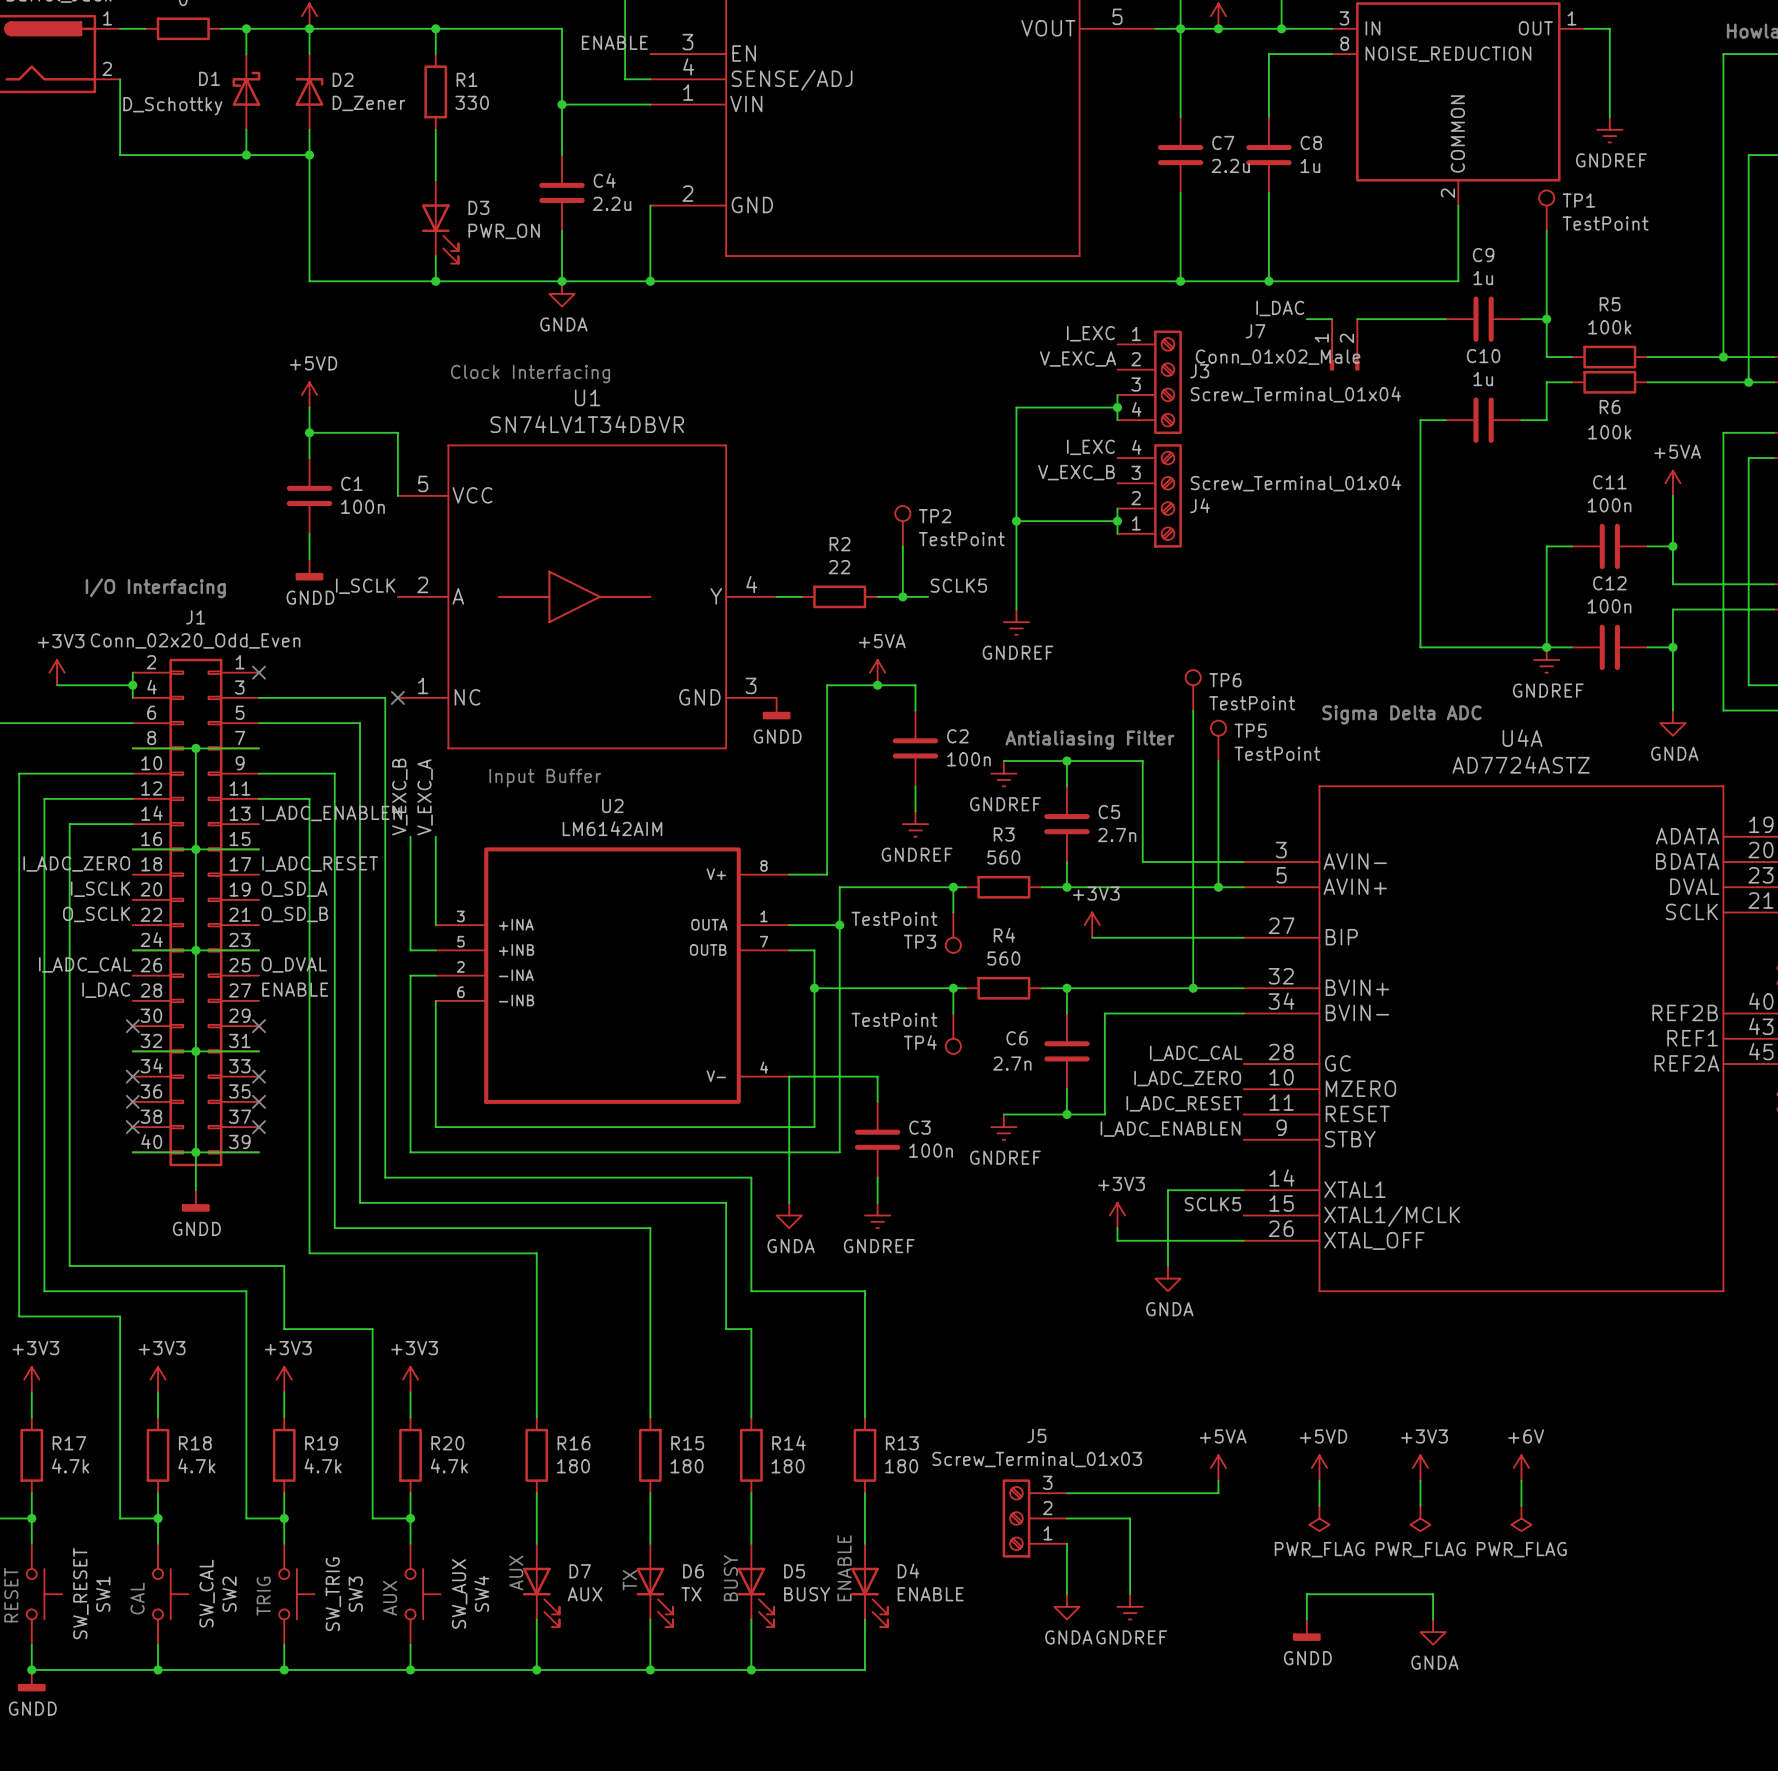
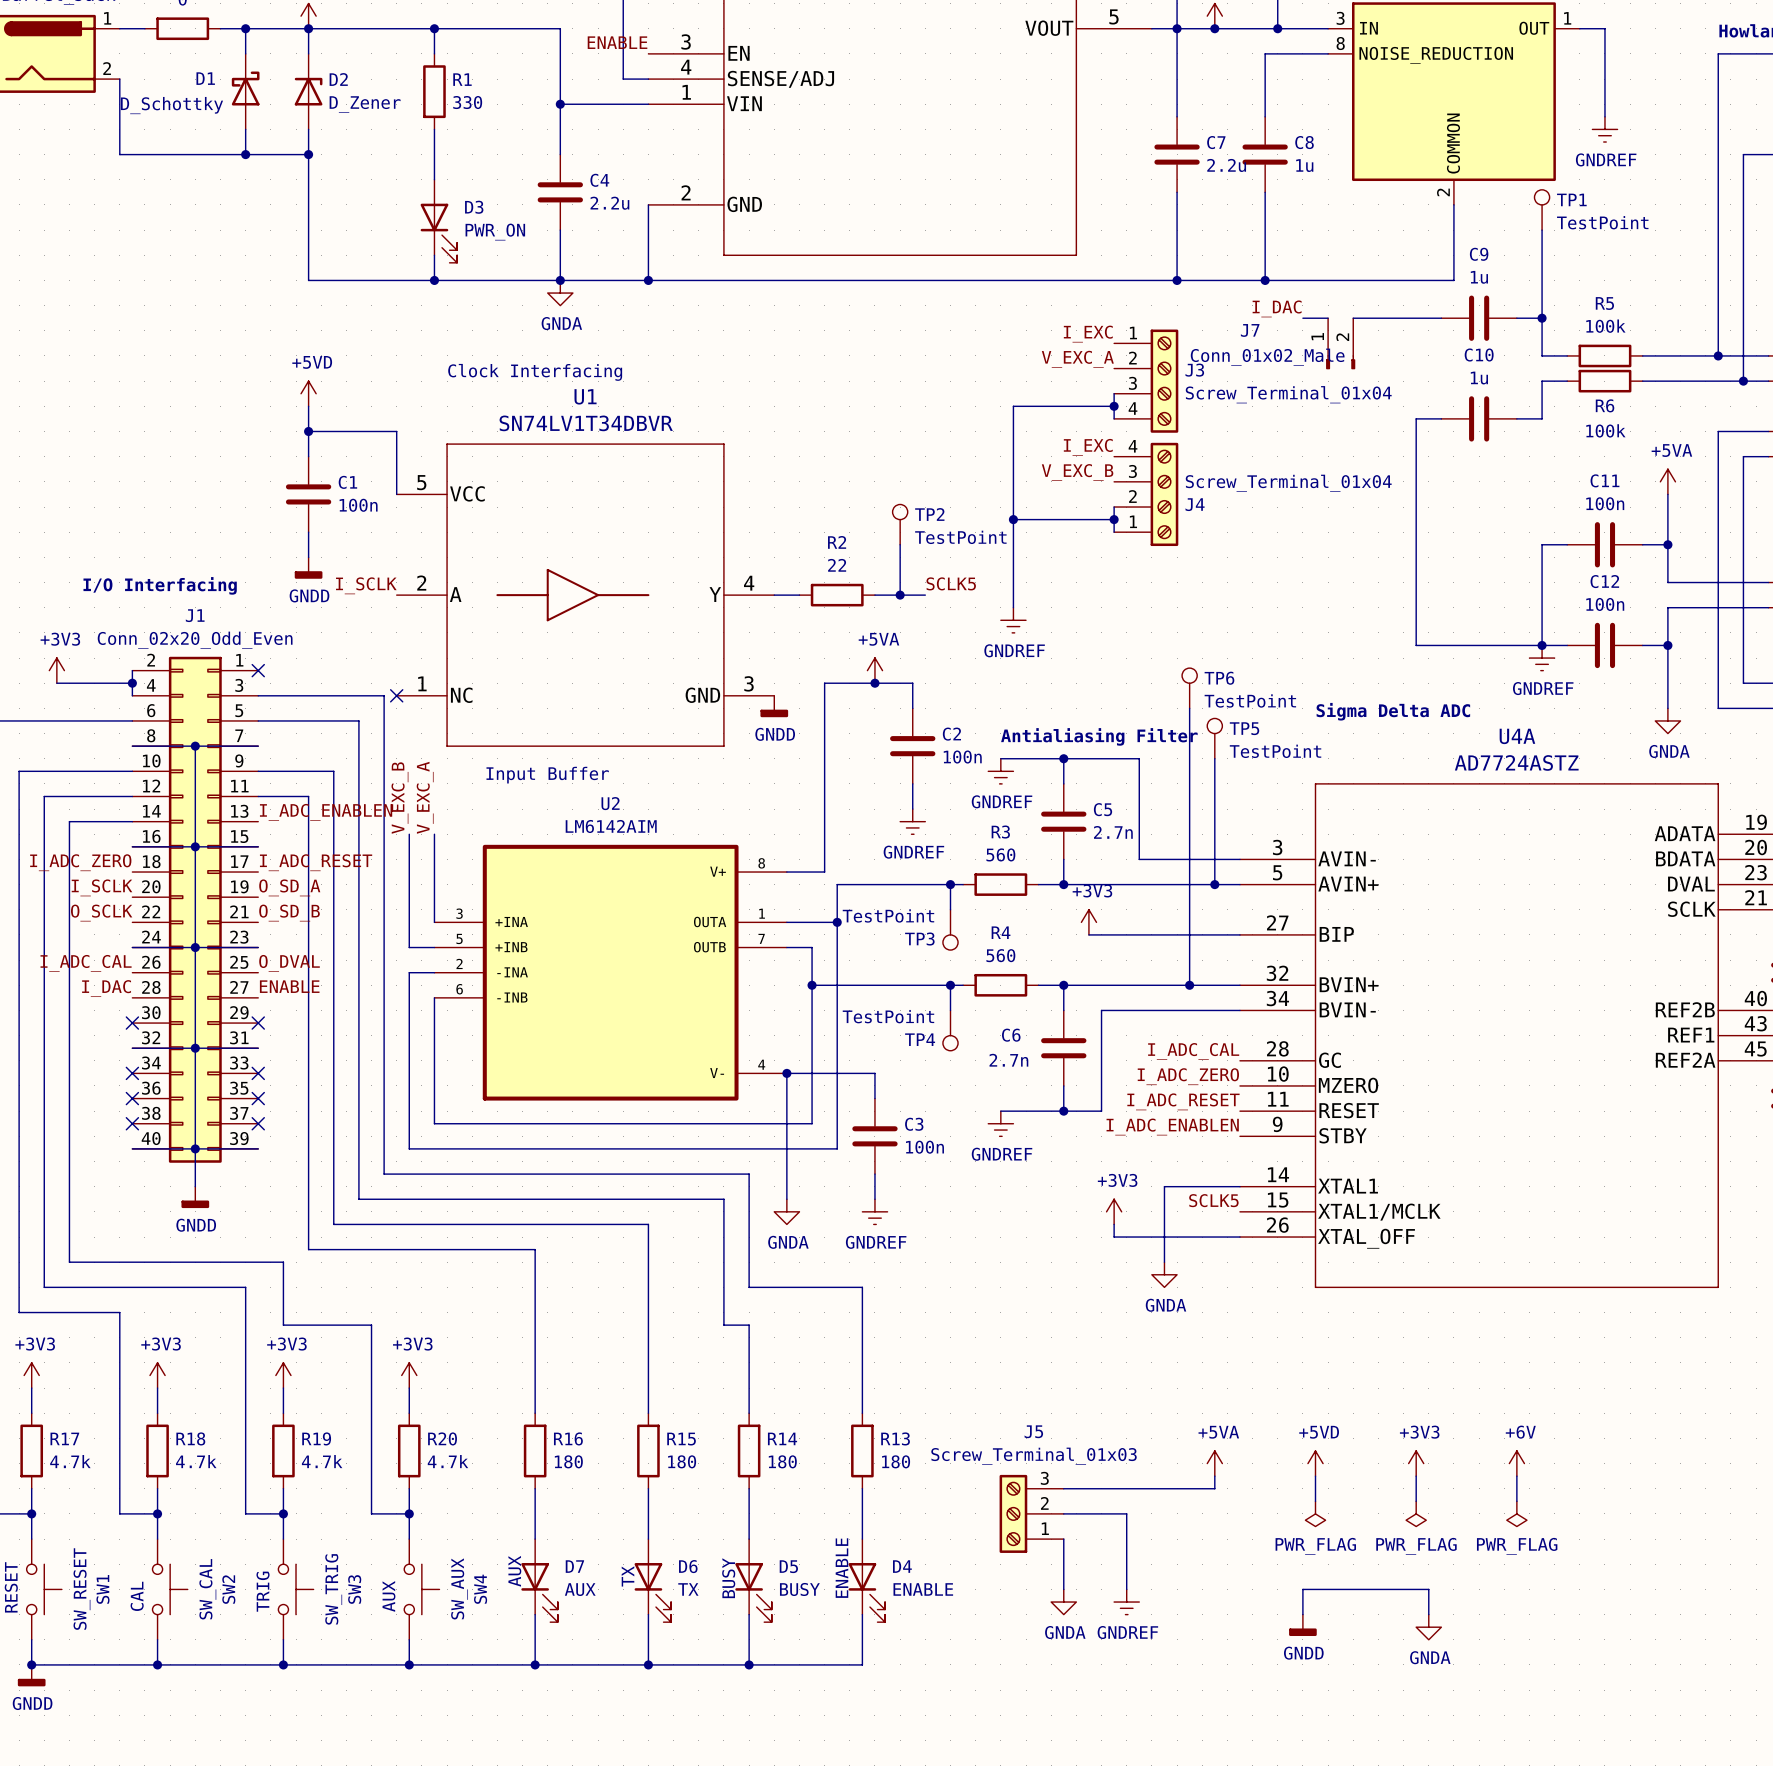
junction: none -> (786, 1073)

